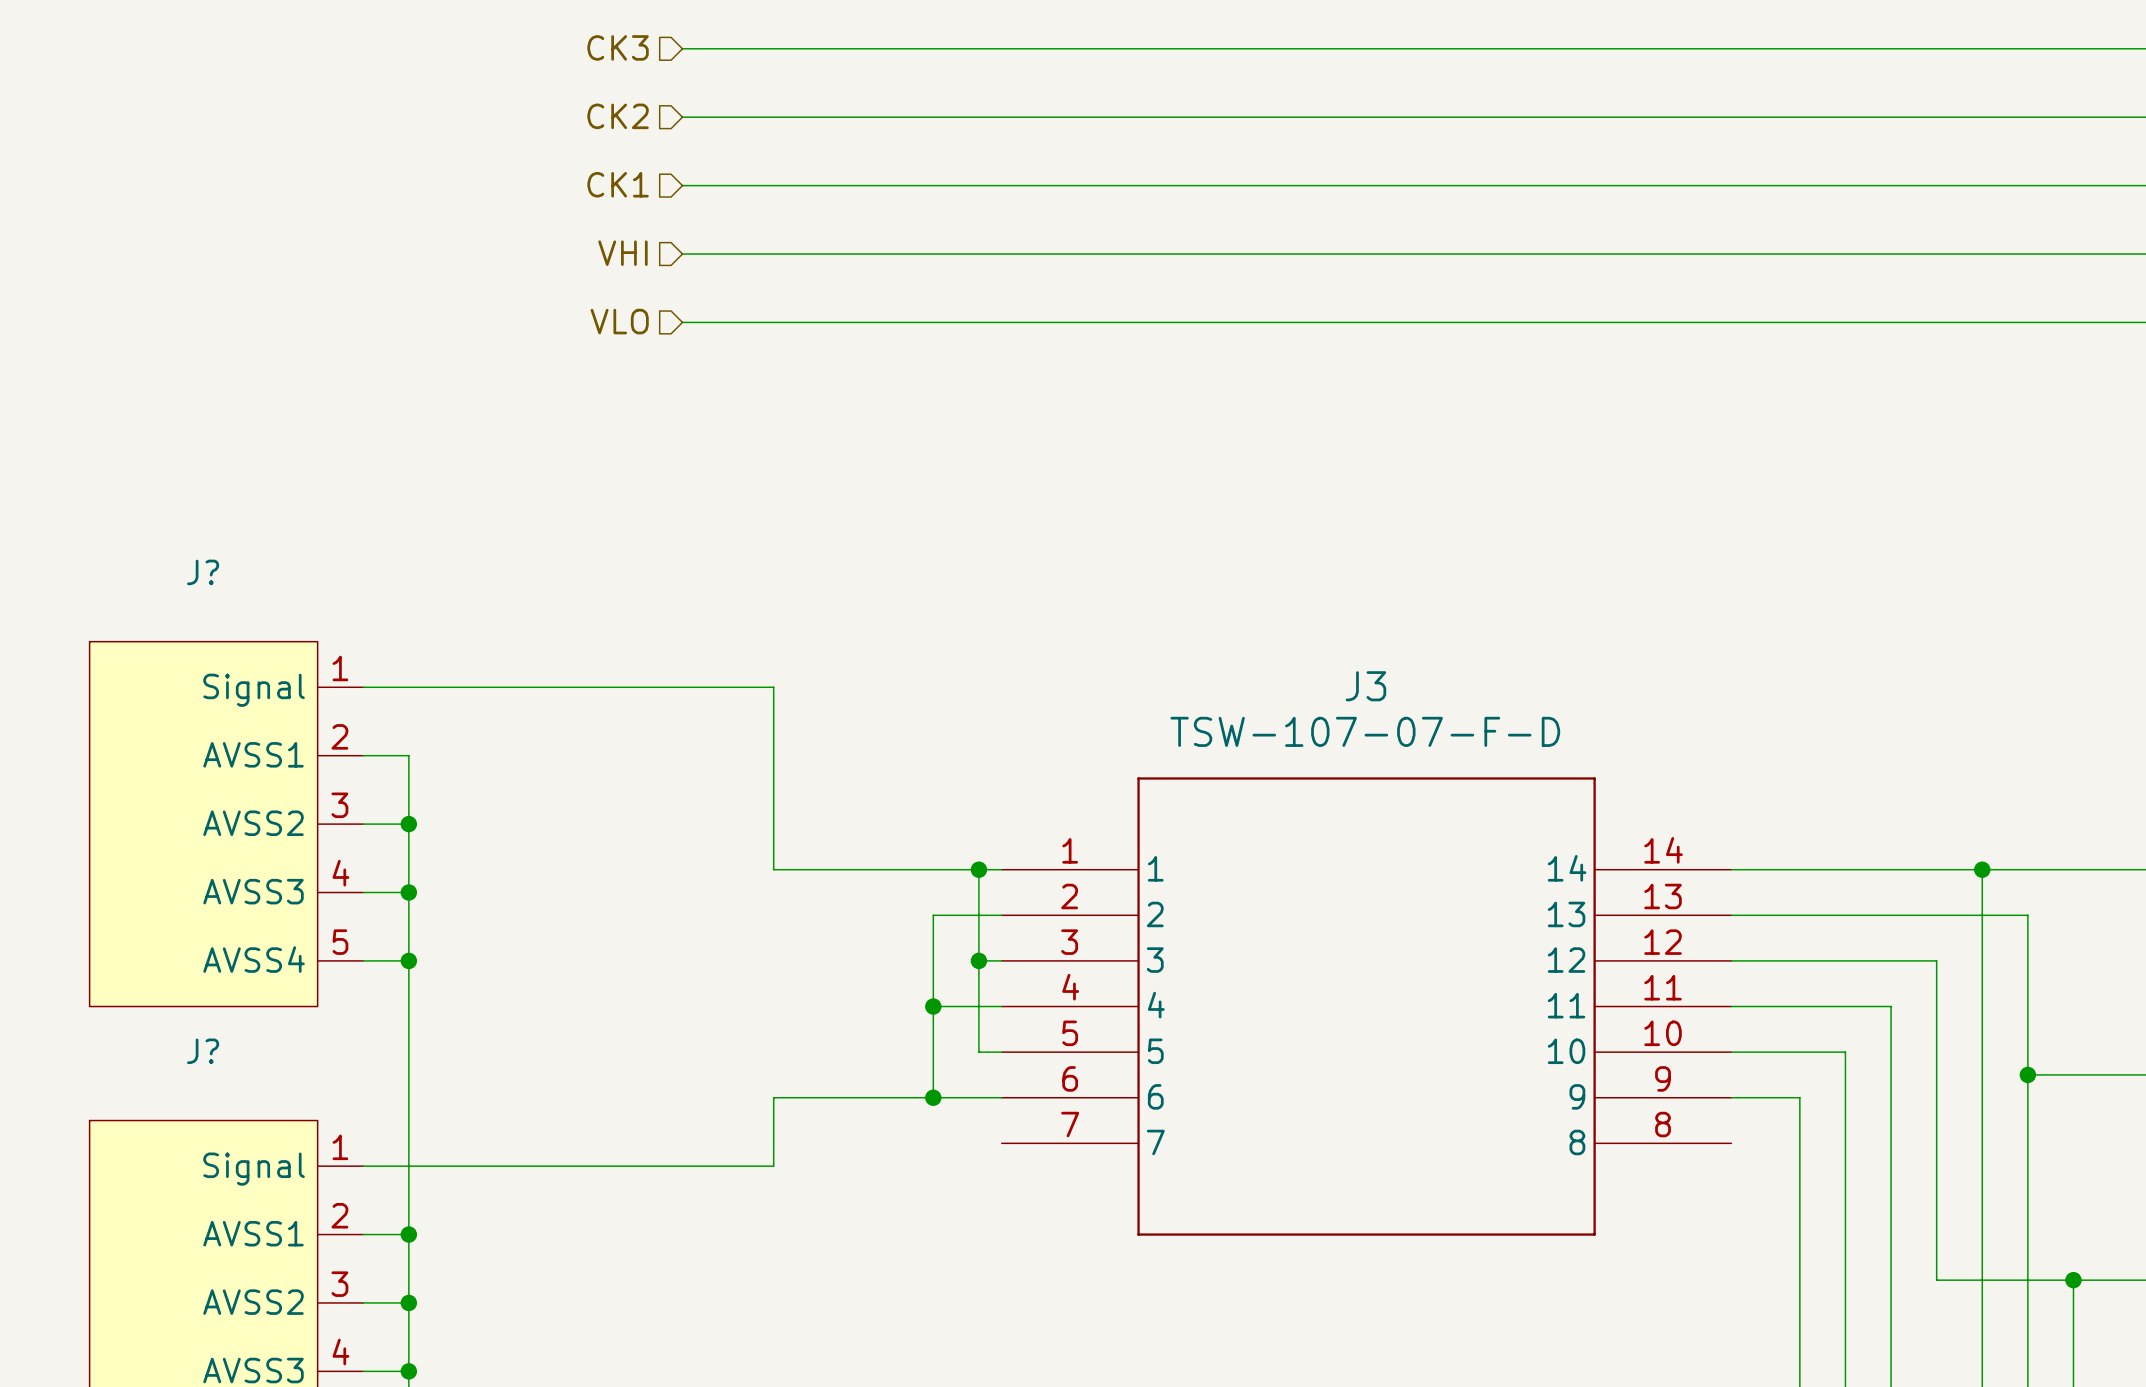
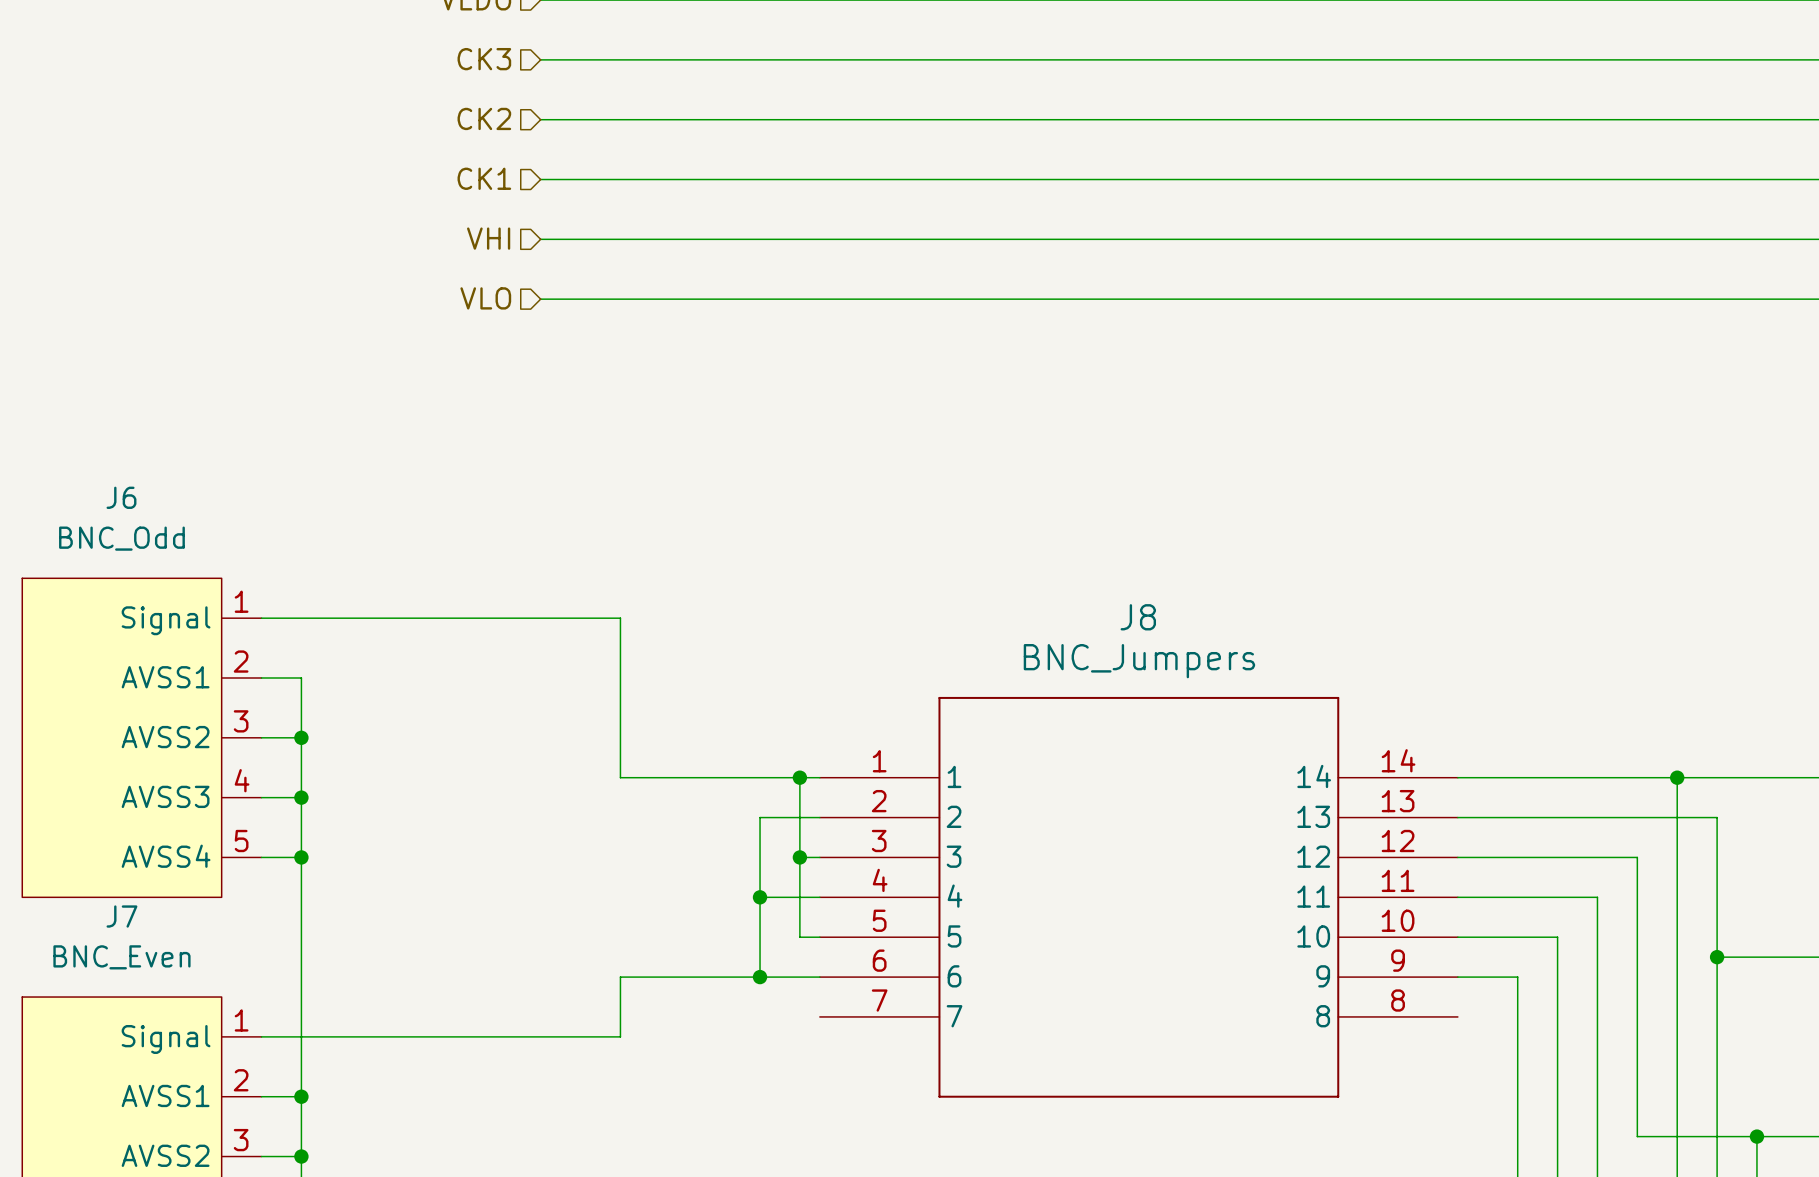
J? name: J? (203, 572) -> J6 (121, 497)
J? value: none -> BNC_Odd (121, 538)
J3 name: J3 (1365, 686) -> J8 (1138, 617)
J3 value: TSW-107-07-F-D (1365, 731) -> BNC_Jumpers (1139, 661)
J? name: J? (203, 1051) -> J7 (121, 916)
J? value: none -> BNC_Even (121, 957)

